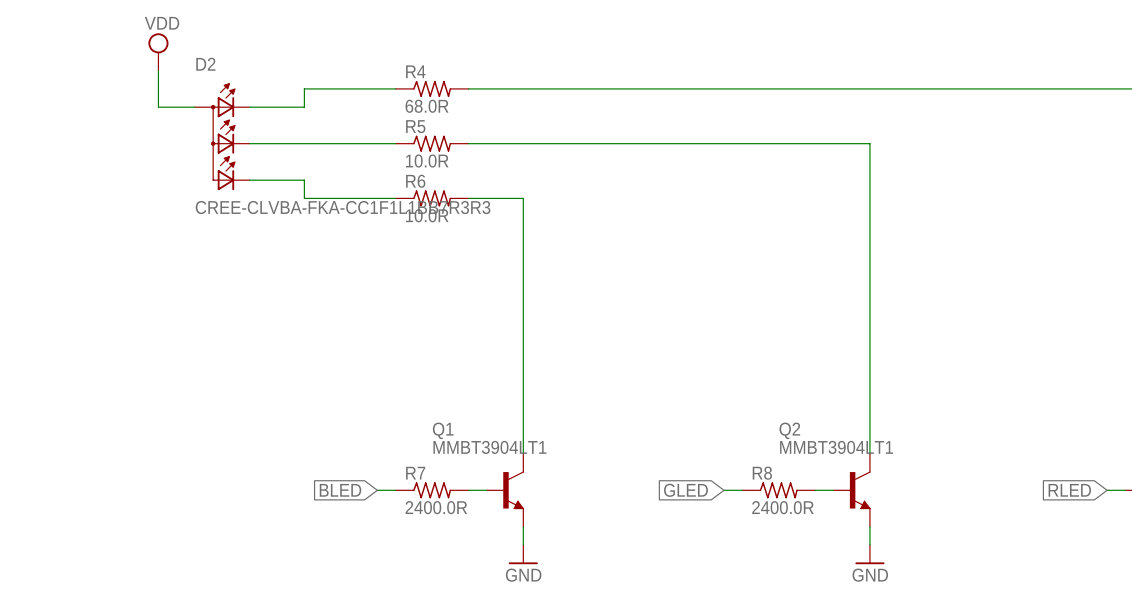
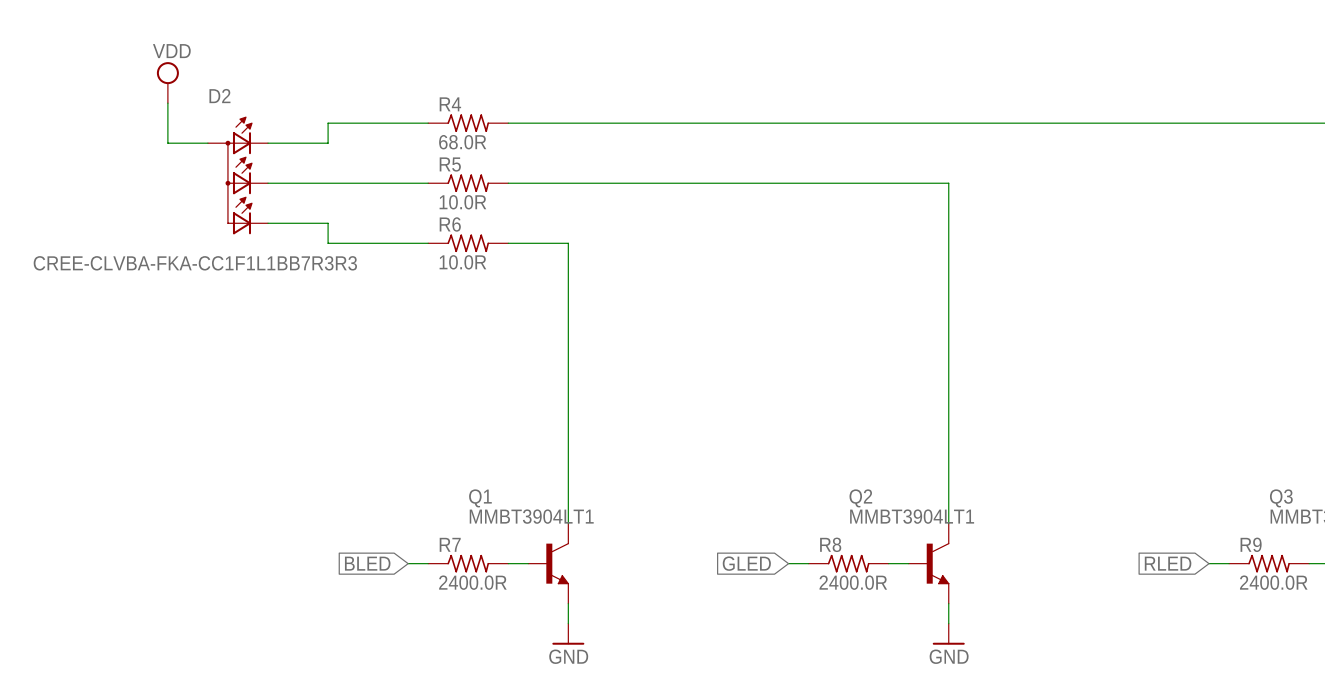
D2 value position: CREE-CLVBA-FKA-CC1F1L1BB7R3R3 (343, 207) -> CREE-CLVBA-FKA-CC1F1L1BB7R3R3 (195, 263)

